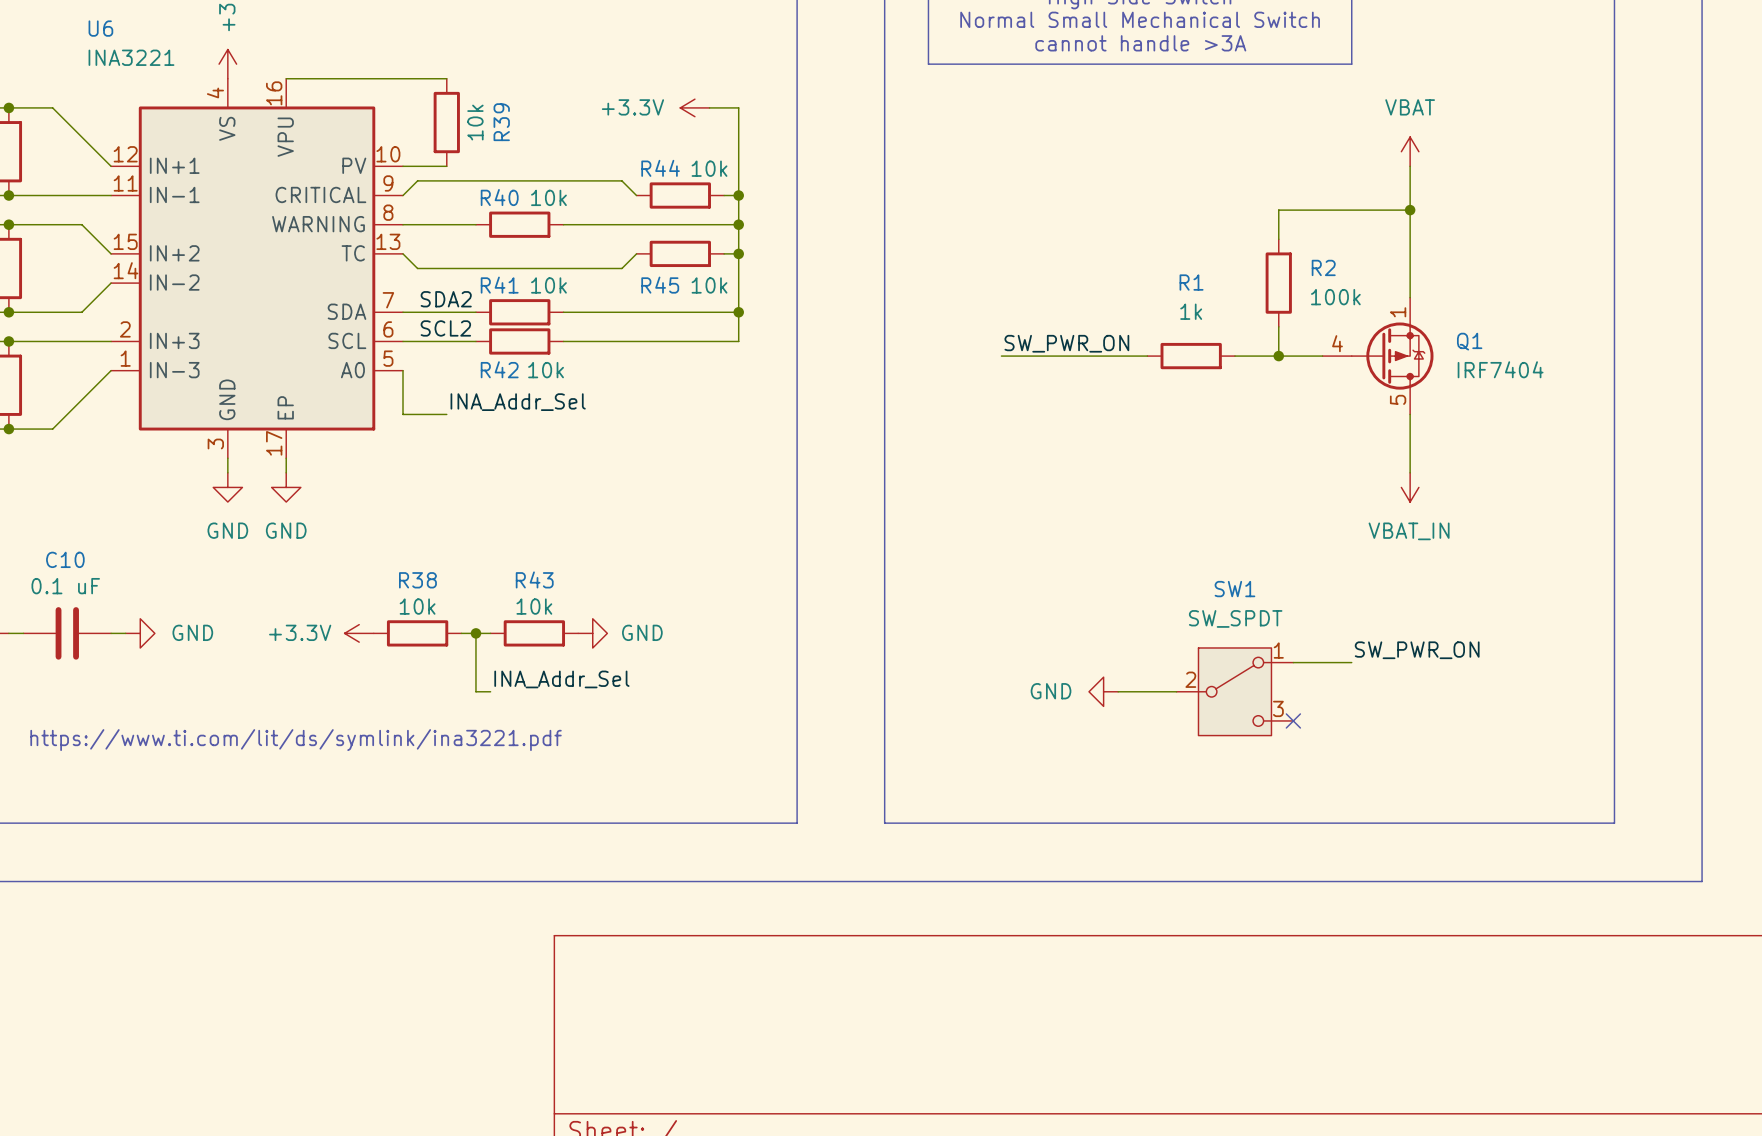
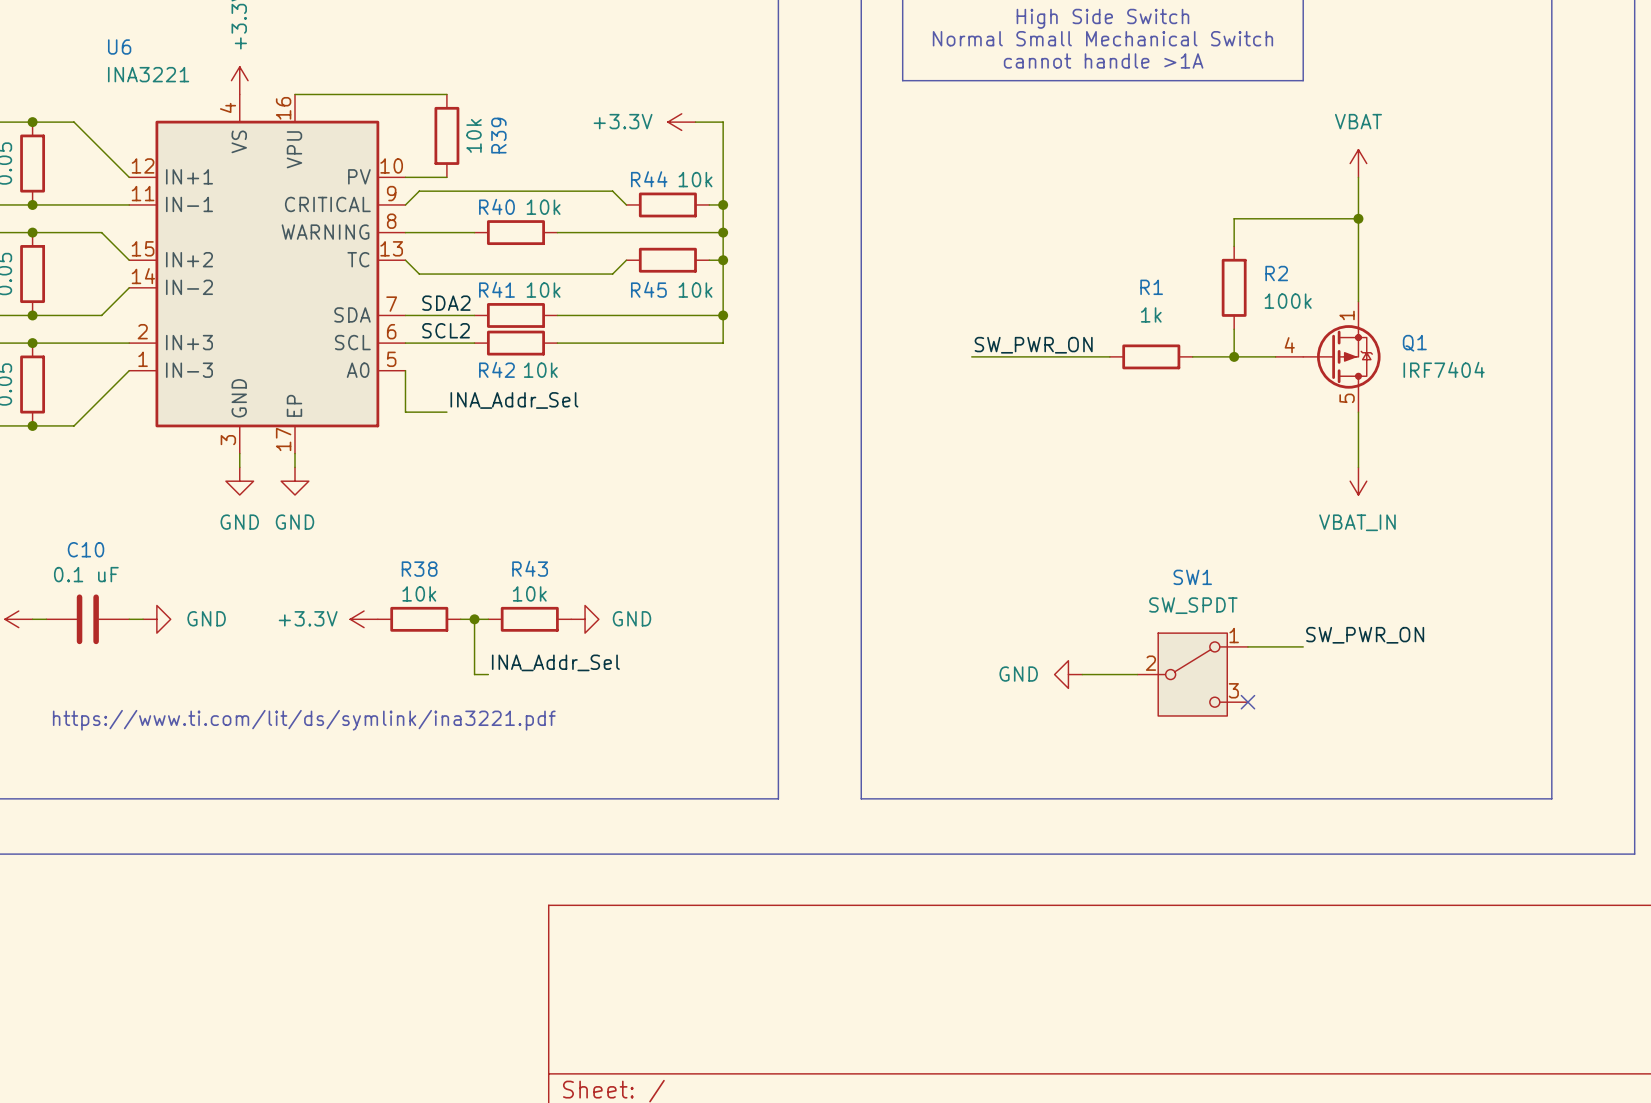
text: cannot handle >3A (1140, 43) -> cannot handle >1A (1103, 60)

